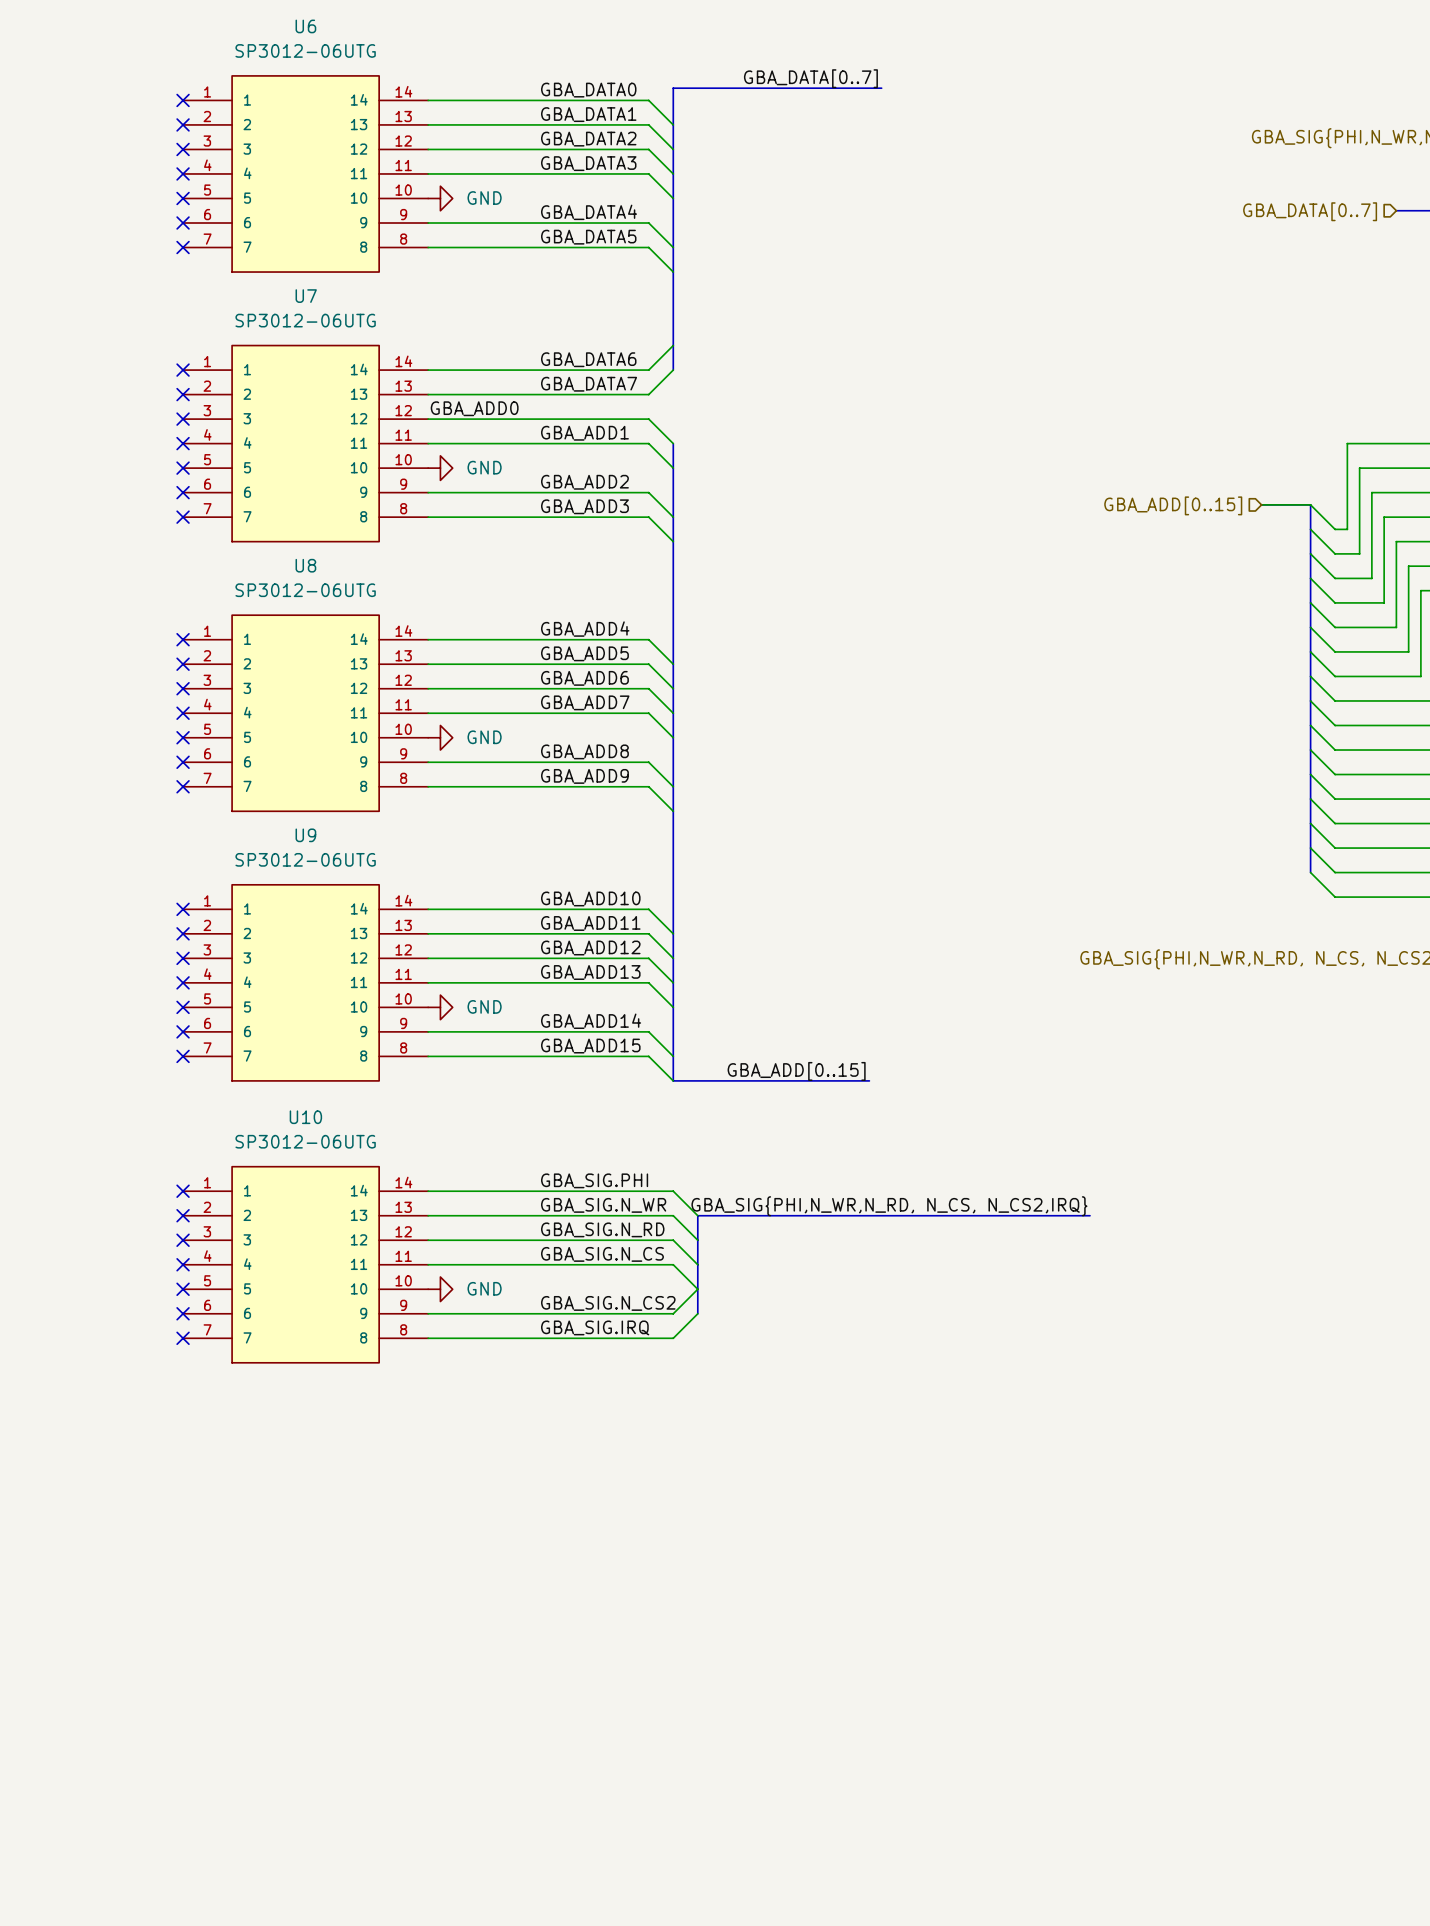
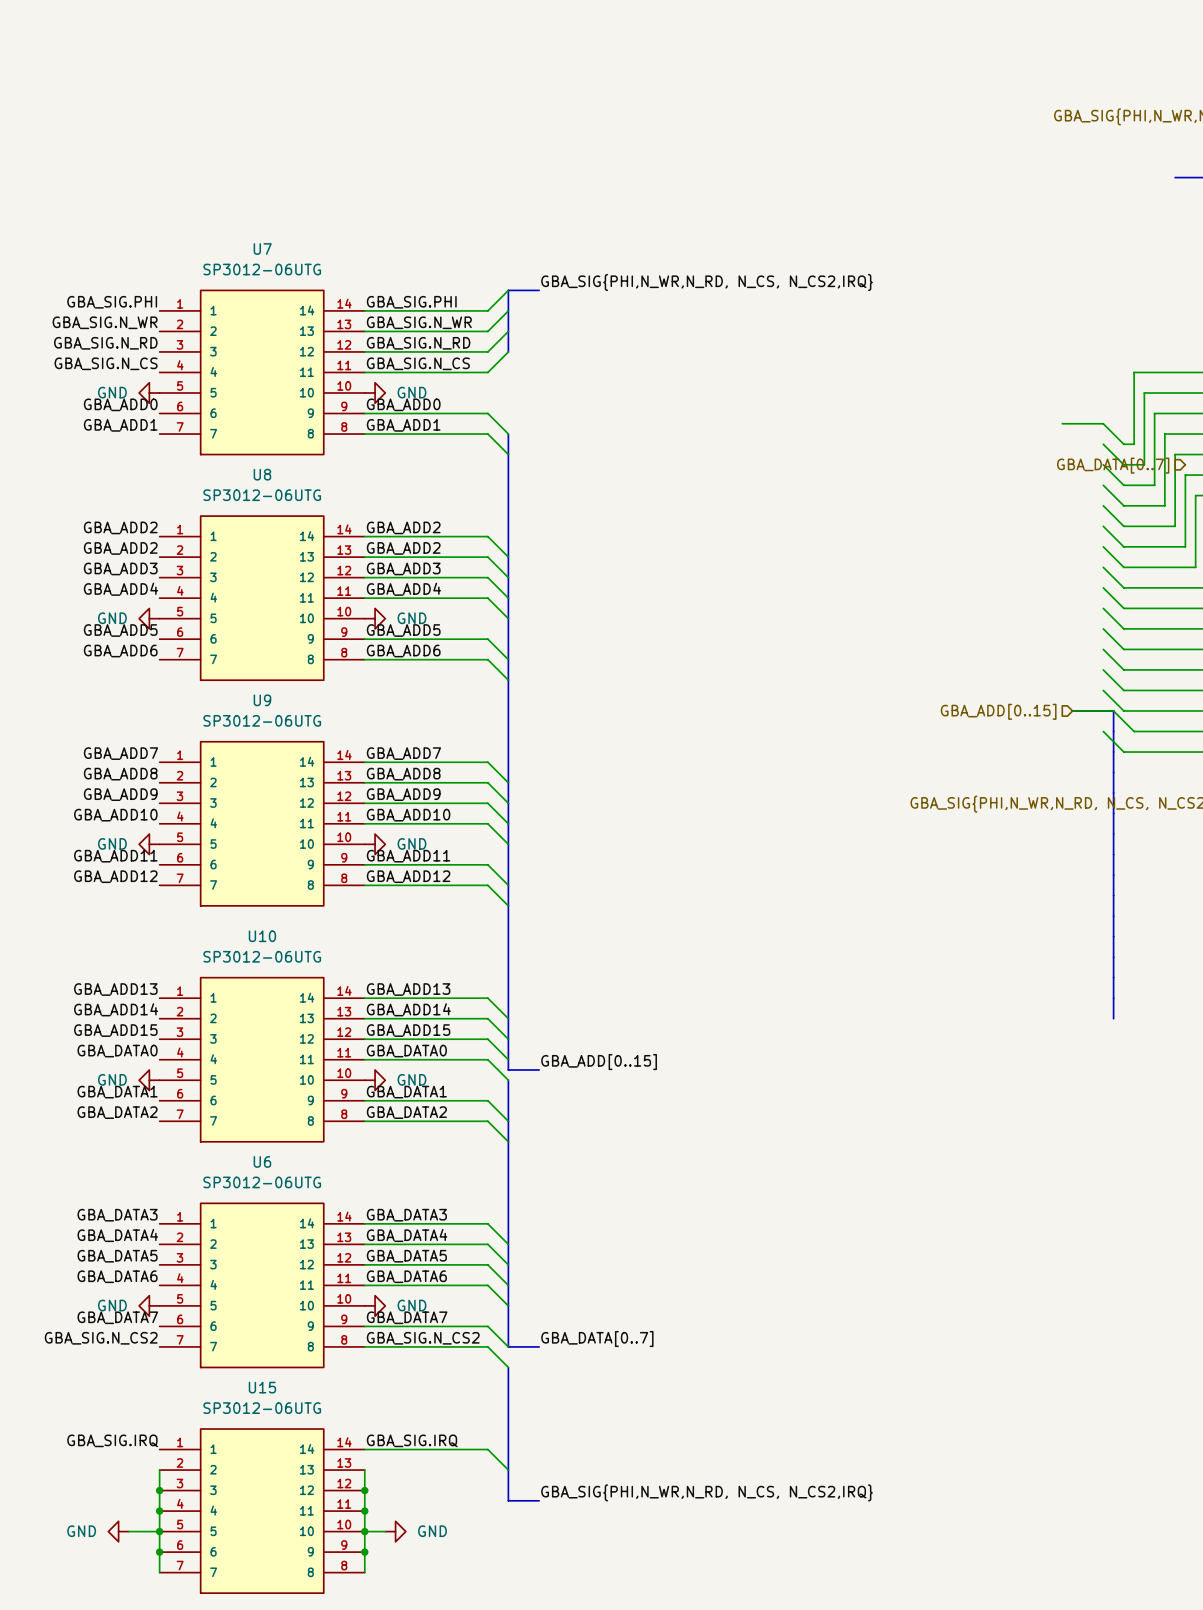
label: GBA_DATA[0..7] (810, 78) -> none
bus: (881, 88) (673, 88) (673, 370) -> none
label: GBA_DATA0 (588, 90) -> none
no-connect mark: (183, 100) -> none
wire: (428, 100) (648, 100) (673, 124) -> none
label: GBA_DATA1 (588, 114) -> none
no-connect mark: (183, 124) -> none
wire: (428, 124) (648, 124) (673, 149) -> none
label: GBA_DATA2 (588, 139) -> none
no-connect mark: (183, 149) -> none
wire: (428, 149) (648, 149) (673, 173) -> none
label: GBA_DATA3 (588, 163) -> none
no-connect mark: (183, 173) -> none
U6 position: (305, 173) -> (262, 1285)
wire: (428, 173) (648, 173) (673, 198) -> none
no-connect mark: (183, 198) -> none
power symbol: GND (440, 198) -> none
hierarchical label: GBA_DATA[0..7] (1310, 211) -> none
label: GBA_DATA4 (589, 212) -> none
no-connect mark: (183, 223) -> none
wire: (428, 223) (648, 223) (673, 247) -> none
label: GBA_DATA5 (588, 237) -> none
no-connect mark: (183, 247) -> none
wire: (428, 247) (648, 247) (673, 272) -> none
label: none -> GBA_SIG{PHI,N_WR,N_RD, N_CS, N_CS2,IRQ} (707, 282)
bus: none -> (539, 290) (508, 290) (508, 351)
wire: (673, 345) (648, 370) (575, 370) -> (508, 290) (487, 310)
label: none -> GBA_SIG.PHI (112, 302)
label: none -> GBA_SIG.PHI (411, 302)
label: GBA_DATA6 (588, 359) -> none
no-connect mark: (183, 370) -> none
wire: (673, 370) (648, 394) (575, 394) -> (508, 310) (487, 331)
label: none -> GBA_SIG.N_WR (105, 322)
label: none -> GBA_SIG.N_WR (419, 322)
label: GBA_DATA7 (589, 384) -> none
no-connect mark: (183, 394) -> none
label: none -> GBA_SIG.N_RD (105, 343)
label: GBA_ADD0 (474, 408) -> GBA_SIG.N_RD (418, 343)
no-connect mark: (183, 419) -> none
wire: (575, 419) (648, 419) (673, 443) -> (487, 351) (508, 331)
label: none -> GBA_SIG.N_CS (106, 363)
label: none -> GBA_SIG.N_CS (418, 363)
label position: GBA_ADD1 (584, 433) -> GBA_ADD1 (403, 425)
no-connect mark: (183, 443) -> none
wire: (575, 443) (648, 443) (673, 468) -> (487, 372) (508, 351)
bus: (673, 443) (673, 1080) (869, 1080) -> none
power symbol: none -> GND (149, 392)
no-connect mark: (183, 468) -> none
label: none -> GBA_ADD0 (120, 404)
label: none -> GBA_ADD0 (403, 404)
label: GBA_ADD2 (584, 482) -> none
no-connect mark: (183, 492) -> none
wire: (575, 492) (648, 492) (673, 517) -> (487, 413) (508, 434)
bus: (1261, 504) (1310, 504) (1310, 872) -> none
hierarchical label: GBA_ADD[0..15] (1173, 505) -> none
label: none -> GBA_ADD1 (120, 425)
label: GBA_ADD3 (584, 506) -> none
no-connect mark: (183, 517) -> none
wire: (575, 517) (648, 517) (673, 541) -> (487, 434) (508, 454)
bus: none -> (508, 434) (508, 1069) (539, 1069)
hierarchical label: none -> GBA_DATA[0..7] (1113, 465)
label: none -> GBA_ADD2 (120, 527)
label: none -> GBA_ADD2 (403, 527)
label position: GBA_ADD4 (585, 629) -> GBA_ADD4 (403, 589)
no-connect mark: (183, 639) -> none
wire: (575, 639) (648, 639) (673, 664) -> (487, 536) (508, 557)
label: none -> GBA_ADD2 (120, 548)
label: none -> GBA_ADD2 (403, 548)
label position: GBA_ADD5 (584, 653) -> GBA_ADD5 (403, 630)
no-connect mark: (183, 664) -> none
wire: (575, 664) (648, 664) (673, 688) -> (487, 557) (508, 577)
label: none -> GBA_ADD3 (120, 568)
label: none -> GBA_ADD3 (403, 568)
label position: GBA_ADD6 (584, 678) -> GBA_ADD6 (403, 651)
no-connect mark: (183, 688) -> none
wire: (575, 688) (648, 688) (673, 713) -> (487, 577) (508, 598)
label: none -> GBA_ADD4 (120, 589)
label: GBA_ADD7 (585, 702) -> none
no-connect mark: (183, 713) -> none
wire: (575, 713) (648, 713) (673, 737) -> (487, 598) (508, 618)
power symbol: none -> GND (149, 618)
no-connect mark: (183, 737) -> none
label: none -> GBA_ADD5 (120, 630)
label: GBA_ADD8 (584, 751) -> none
no-connect mark: (183, 762) -> none
wire: (575, 762) (648, 762) (673, 786) -> (487, 639) (508, 659)
label: none -> GBA_ADD6 (120, 651)
label: GBA_ADD9 (584, 776) -> none
no-connect mark: (183, 786) -> none
wire: (575, 786) (648, 786) (673, 811) -> (487, 659) (508, 680)
bus: none -> (1072, 710) (1113, 710) (1113, 1018)
wire: (1310, 848) (1335, 872) (1347, 872) -> (1072, 710) (1113, 710) (1134, 731)
hierarchical label: none -> GBA_ADD[0..15] (998, 711)
label: none -> GBA_ADD7 (120, 753)
label: none -> GBA_ADD7 (403, 753)
label position: GBA_ADD10 (590, 898) -> GBA_ADD10 (408, 815)
no-connect mark: (183, 909) -> none
wire: (575, 909) (648, 909) (673, 933) -> (487, 762) (508, 782)
label: none -> GBA_ADD8 (120, 774)
label: none -> GBA_ADD8 (403, 774)
label position: GBA_ADD11 (590, 923) -> GBA_ADD11 (408, 856)
no-connect mark: (183, 933) -> none
wire: (575, 933) (648, 933) (673, 958) -> (487, 782) (508, 803)
label: none -> GBA_ADD9 (120, 794)
label: none -> GBA_ADD9 (403, 794)
label position: GBA_ADD12 (590, 948) -> GBA_ADD12 (408, 876)
no-connect mark: (183, 958) -> none
wire: (575, 958) (648, 958) (673, 982) -> (487, 803) (508, 823)
label: none -> GBA_ADD10 (115, 815)
label: GBA_ADD13 (590, 972) -> none
no-connect mark: (183, 982) -> none
wire: (575, 982) (648, 982) (673, 1007) -> (487, 823) (508, 844)
power symbol: none -> GND (149, 844)
no-connect mark: (183, 1007) -> none
label: none -> GBA_ADD11 (115, 856)
label: GBA_ADD14 (591, 1021) -> none
no-connect mark: (183, 1031) -> none
wire: (575, 1031) (648, 1031) (673, 1056) -> (487, 864) (508, 885)
label: none -> GBA_ADD12 (115, 876)
label: GBA_ADD15 (590, 1046) -> none
no-connect mark: (183, 1056) -> none
wire: (575, 1056) (648, 1056) (673, 1080) -> (487, 885) (508, 905)
label: GBA_ADD[0..15] (796, 1071) -> none
label: none -> GBA_ADD13 (115, 989)
label: none -> GBA_ADD13 (408, 989)
label: GBA_SIG.PHI (594, 1180) -> none
no-connect mark: (183, 1191) -> none
wire: (575, 1191) (673, 1191) (697, 1215) -> (487, 998) (508, 1018)
label: none -> GBA_ADD14 (116, 1009)
label: none -> GBA_ADD14 (408, 1009)
label: GBA_SIG.N_WR (603, 1205) -> none
label: GBA_SIG{PHI,N_WR,N_RD, N_CS, N_CS2,IRQ} (889, 1206) -> none
no-connect mark: (183, 1215) -> none
wire: (575, 1215) (673, 1215) (697, 1240) -> (487, 1018) (508, 1039)
bus: (1089, 1215) (697, 1215) (697, 1313) -> none
label: none -> GBA_ADD15 (115, 1030)
label: none -> GBA_ADD15 (408, 1030)
label: GBA_SIG.N_RD (602, 1229) -> none
no-connect mark: (183, 1240) -> none
wire: (575, 1240) (673, 1240) (697, 1264) -> (487, 1039) (508, 1059)
label: none -> GBA_DATA0 (117, 1051)
label: none -> GBA_DATA0 (406, 1051)
label: GBA_SIG.N_CS (602, 1254) -> none
no-connect mark: (183, 1264) -> none
wire: (575, 1264) (673, 1264) (697, 1289) (673, 1313) (575, 1313) -> (487, 1059) (508, 1080)
label: none -> GBA_ADD[0..15] (599, 1062)
power symbol: none -> GND (149, 1080)
no-connect mark: (183, 1289) -> none
bus: none -> (508, 1080) (508, 1346) (539, 1346)
label: none -> GBA_DATA1 (117, 1092)
label: none -> GBA_DATA1 (406, 1092)
label: GBA_SIG.N_CS2 (608, 1303) -> none
no-connect mark: (183, 1313) -> none
wire: none -> (487, 1100) (508, 1121)
wire: (697, 1313) (673, 1338) (575, 1338) -> (508, 1141) (487, 1121)
label: none -> GBA_DATA2 (117, 1112)
label: none -> GBA_DATA2 (406, 1112)
label: GBA_SIG.IRQ (595, 1327) -> none
no-connect mark: (183, 1338) -> none
label: none -> GBA_DATA3 (117, 1215)
label: none -> GBA_DATA3 (406, 1215)
wire: none -> (364, 1223) (487, 1223) (508, 1244)
label: none -> GBA_DATA4 (117, 1235)
label: none -> GBA_DATA4 (407, 1235)
wire: none -> (364, 1244) (487, 1244) (508, 1264)
label: none -> GBA_DATA5 (117, 1256)
label: none -> GBA_DATA5 (406, 1256)
wire: none -> (364, 1264) (487, 1264) (508, 1285)
label: none -> GBA_DATA6 (117, 1276)
label: none -> GBA_DATA6 (406, 1276)
wire: none -> (364, 1285) (487, 1285) (508, 1305)
power symbol: none -> GND (149, 1305)
power symbol: none -> GND (375, 1305)
label: none -> GBA_DATA7 (117, 1317)
label: none -> GBA_DATA7 (407, 1317)
wire: none -> (364, 1326) (487, 1326) (508, 1346)
label: none -> GBA_SIG.N_CS2 (101, 1338)
label: none -> GBA_SIG.N_CS2 (423, 1338)
label: none -> GBA_DATA[0..7] (597, 1339)
wire: none -> (364, 1346) (487, 1346) (508, 1367)
bus: none -> (508, 1367) (508, 1500) (539, 1500)
label: none -> GBA_SIG.IRQ (112, 1440)
label: none -> GBA_SIG.IRQ (412, 1440)
wire: none -> (364, 1449) (487, 1449) (508, 1470)
wire: none -> (159, 1470) (159, 1572)
wire: none -> (364, 1470) (364, 1572)
junction: none -> (159, 1490)
junction: none -> (364, 1490)
label: none -> GBA_SIG{PHI,N_WR,N_RD, N_CS, N_CS2,IRQ} (707, 1492)
junction: none -> (159, 1511)
U15: none -> SP3012-06UTG (262, 1511)
junction: none -> (364, 1511)
power symbol: none -> GND (118, 1531)
wire: none -> (128, 1531) (159, 1531)
junction: none -> (159, 1531)
wire: none -> (364, 1531) (385, 1531)
junction: none -> (364, 1531)
power symbol: none -> GND (395, 1531)
junction: none -> (159, 1552)
junction: none -> (364, 1552)

